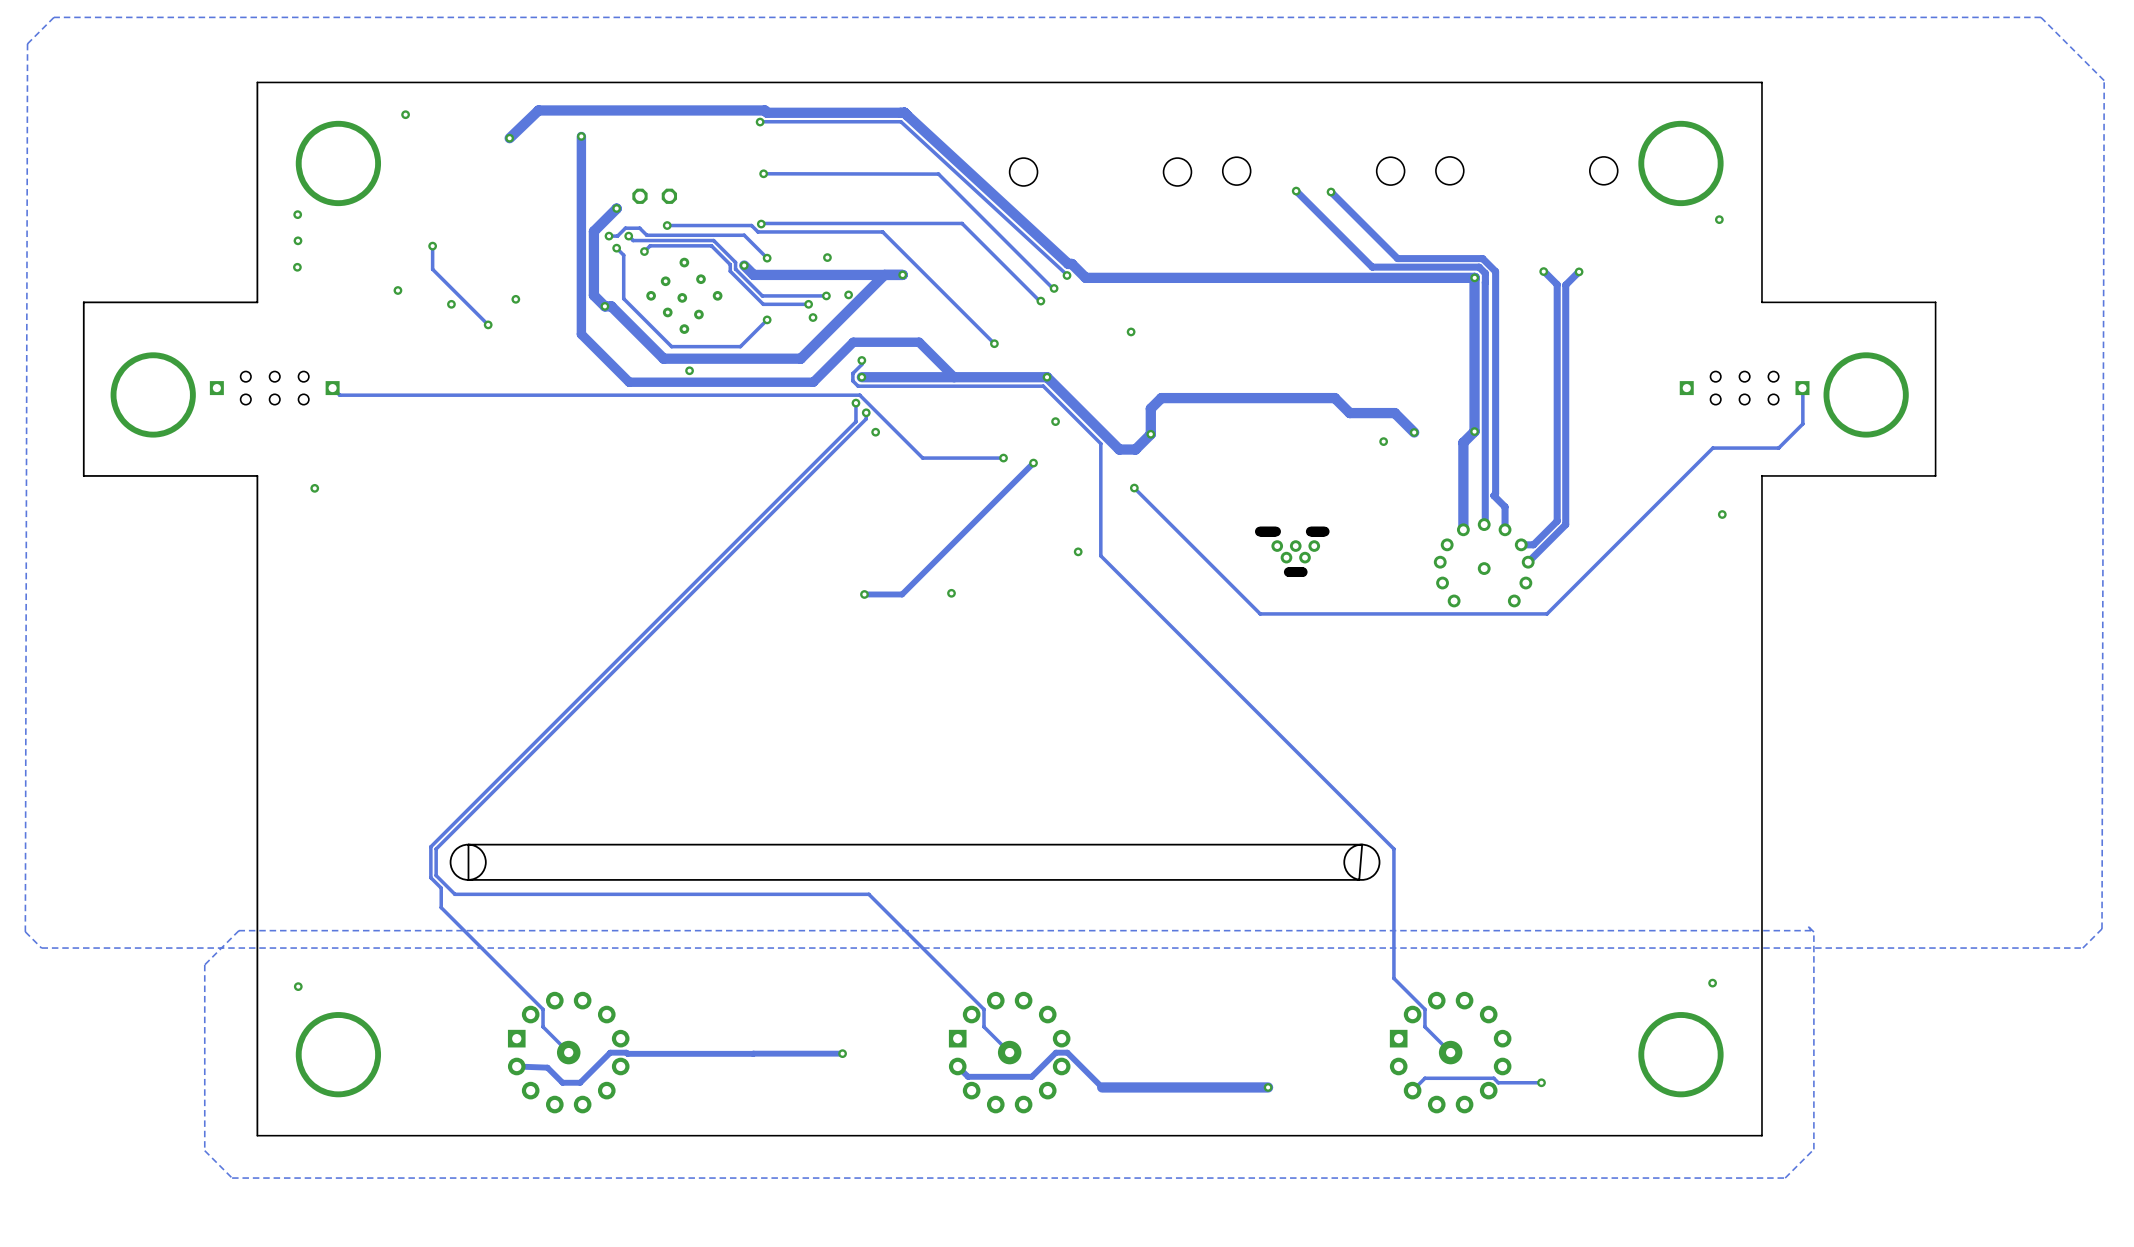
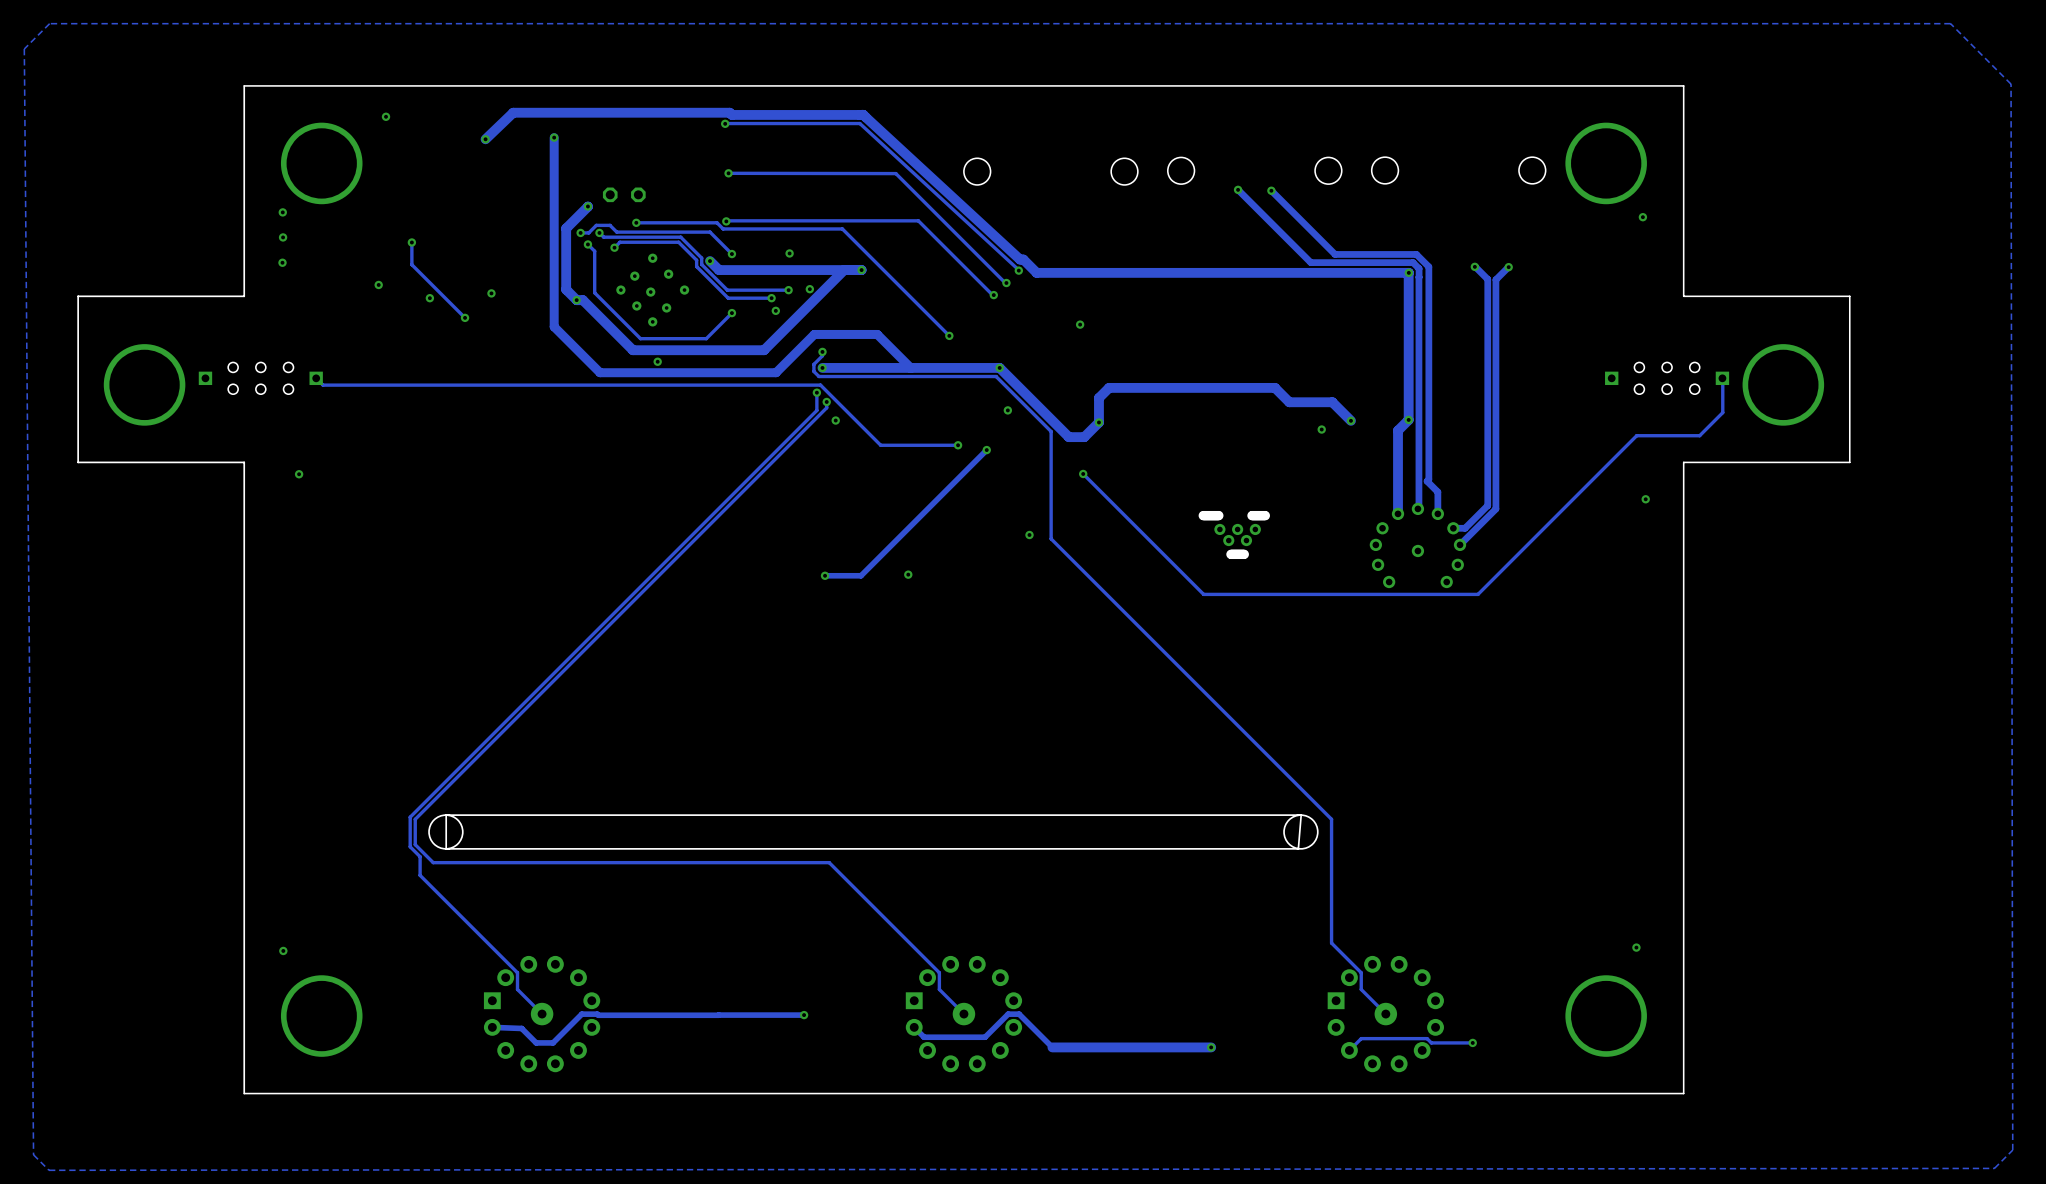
zone outline: (27, 43) (25, 931) (41, 948) (2082, 948) (2102, 928) (2104, 80) -> (24, 49) (33, 1154) (49, 1170) (1994, 1168) (2012, 1150) (2011, 84)
zone outline: (1808, 926) (1813, 932) (1813, 1149) (1785, 1178) (232, 1178) (204, 1150) (204, 964) (238, 930) (1811, 930) (1808, 926) -> none

